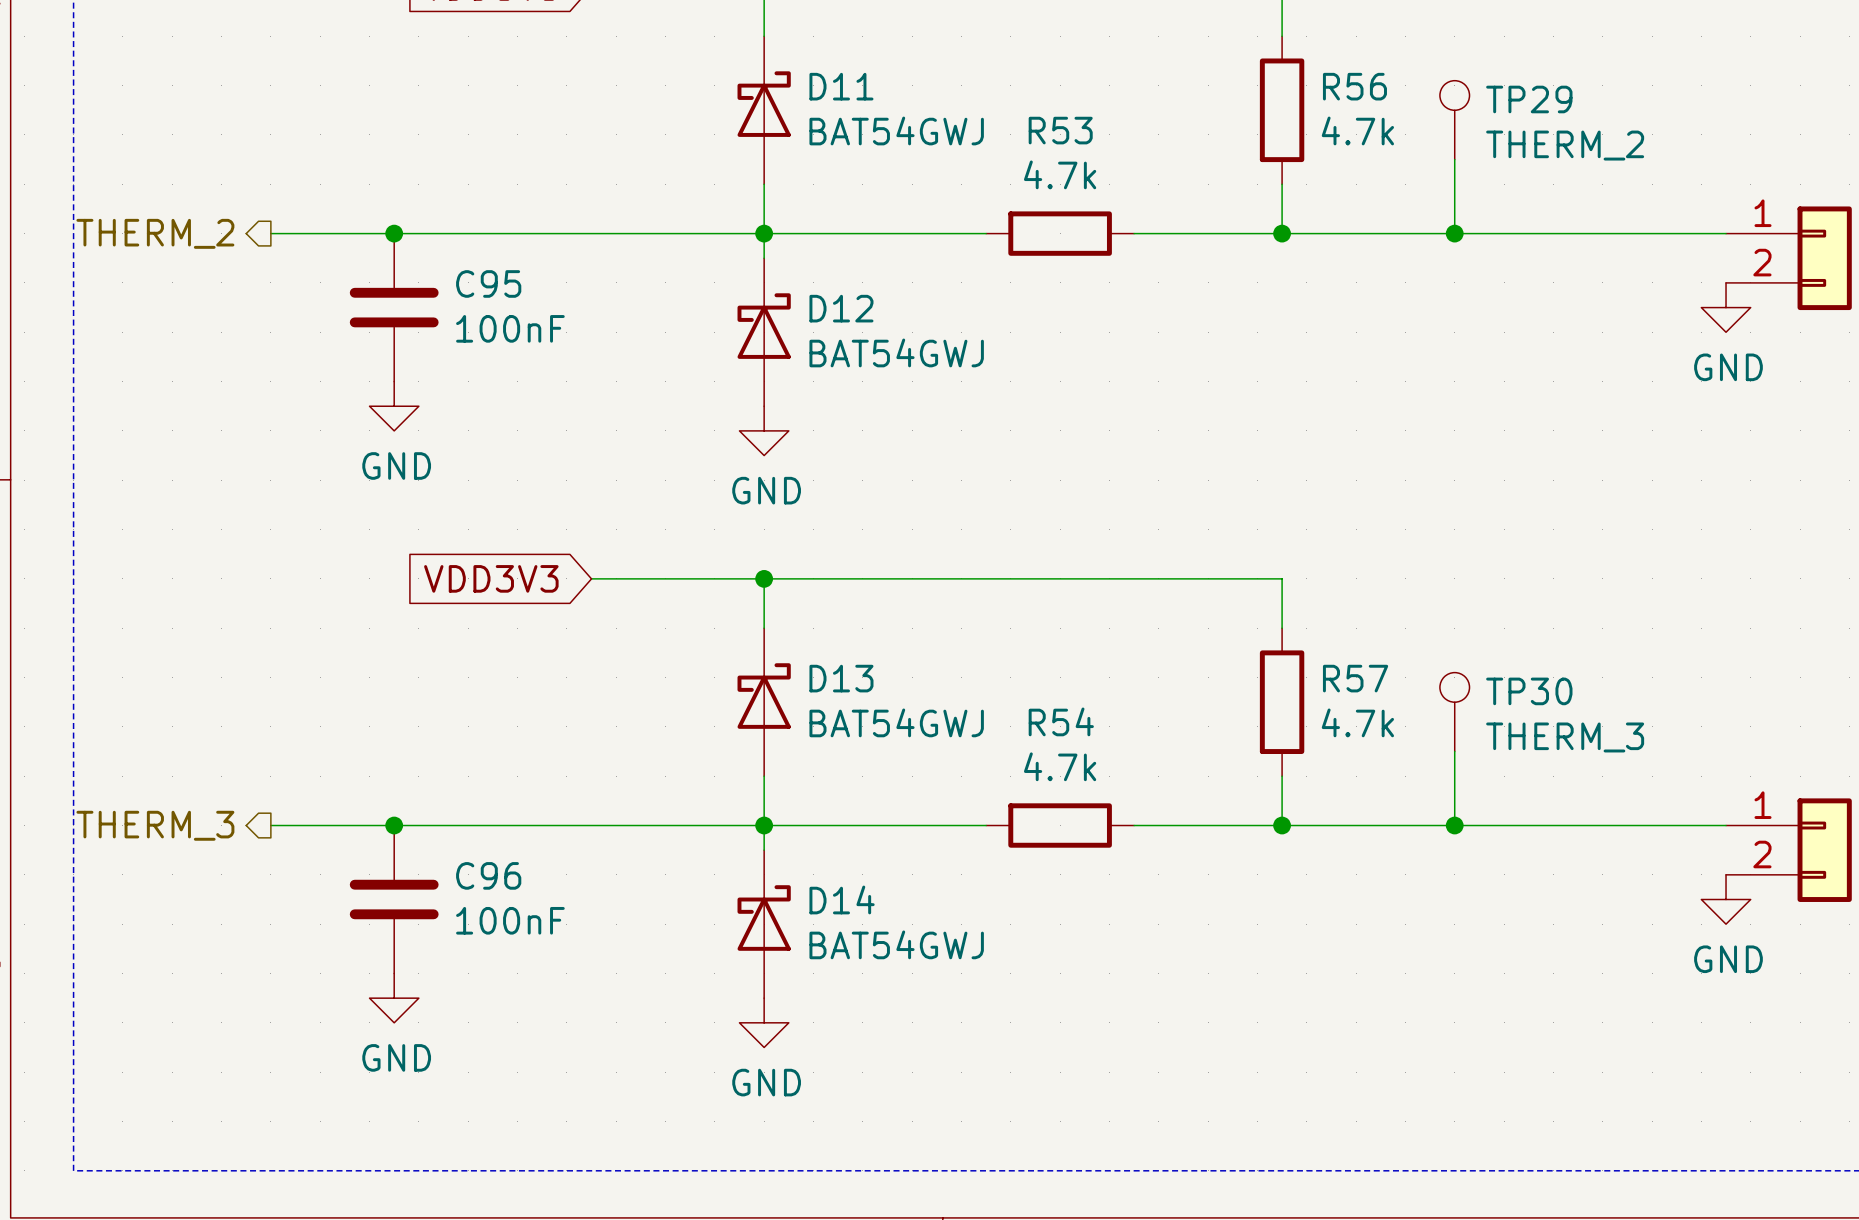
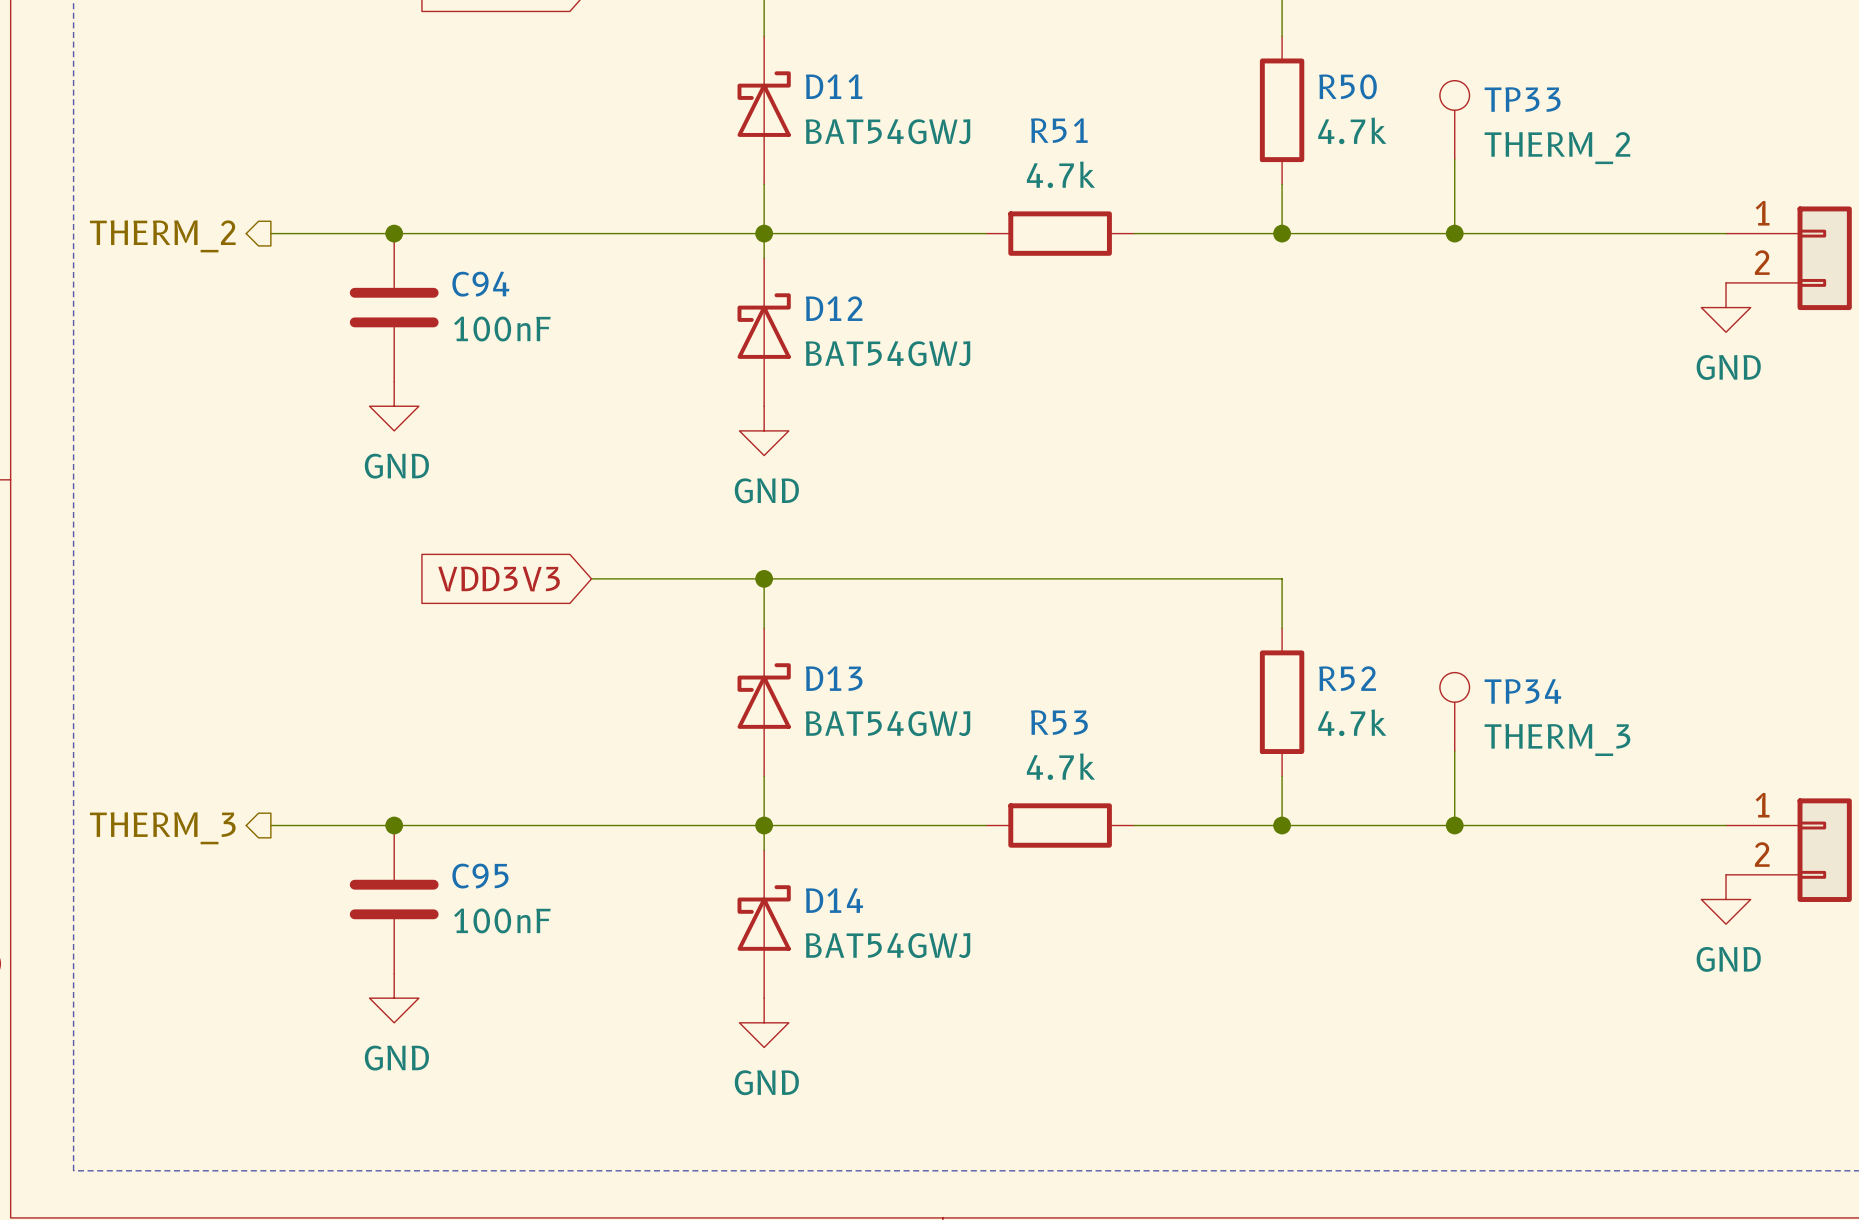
R56 name: R56 (1354, 86) -> R50 (1347, 86)
TP29 name: TP29 (1529, 99) -> TP33 (1522, 99)
R53 name: R53 (1060, 130) -> R51 (1059, 130)
C95 name: C95 (488, 283) -> C94 (480, 284)
R57 name: R57 (1355, 678) -> R52 (1347, 678)
TP30 name: TP30 (1529, 691) -> TP34 (1522, 691)
R54 name: R54 (1061, 721) -> R53 (1059, 722)
C96 name: C96 (488, 875) -> C95 (480, 876)

